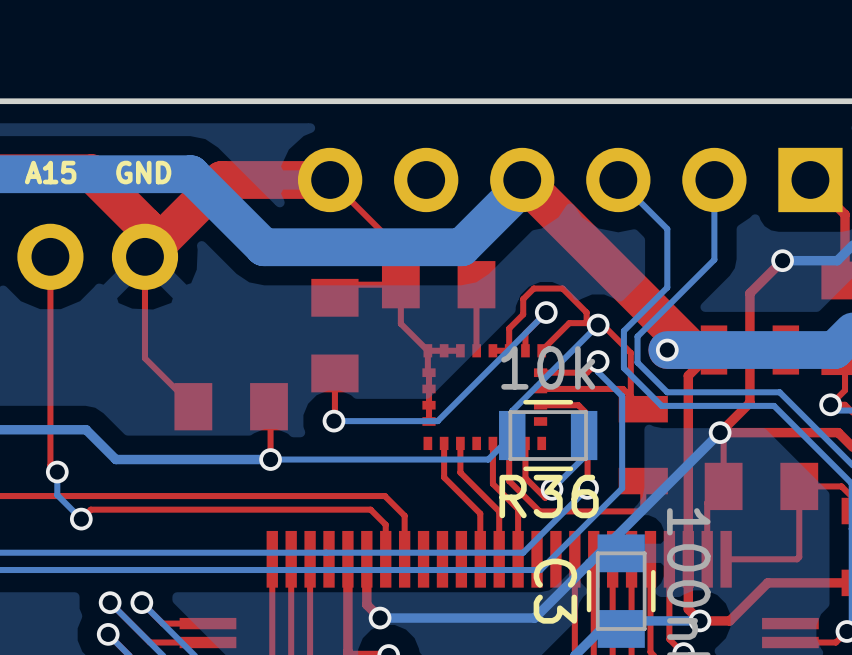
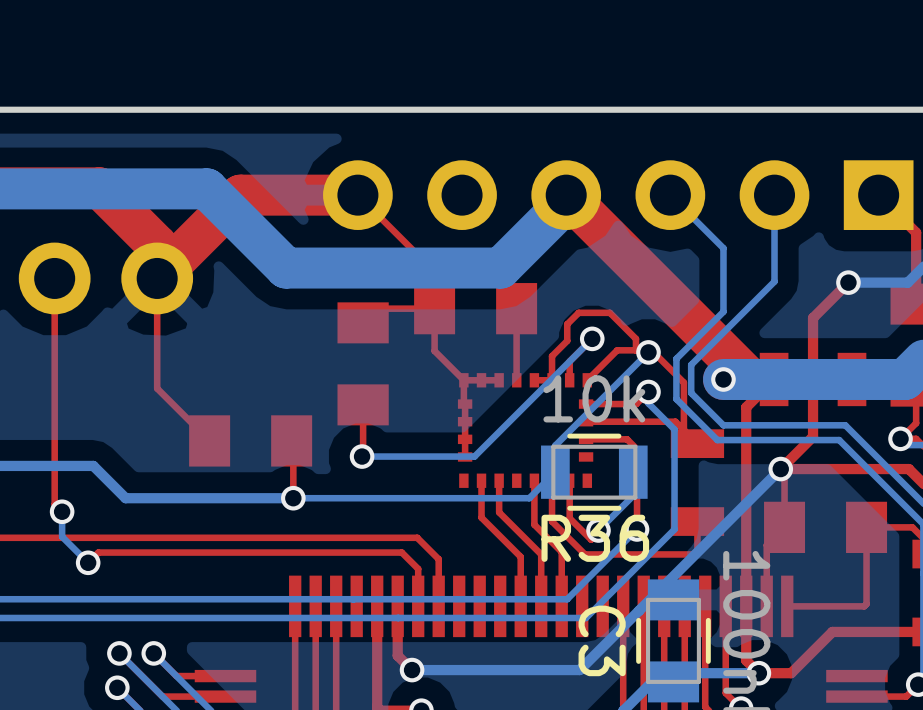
text: A15 (50, 172) -> none
text: GND (143, 172) -> none

